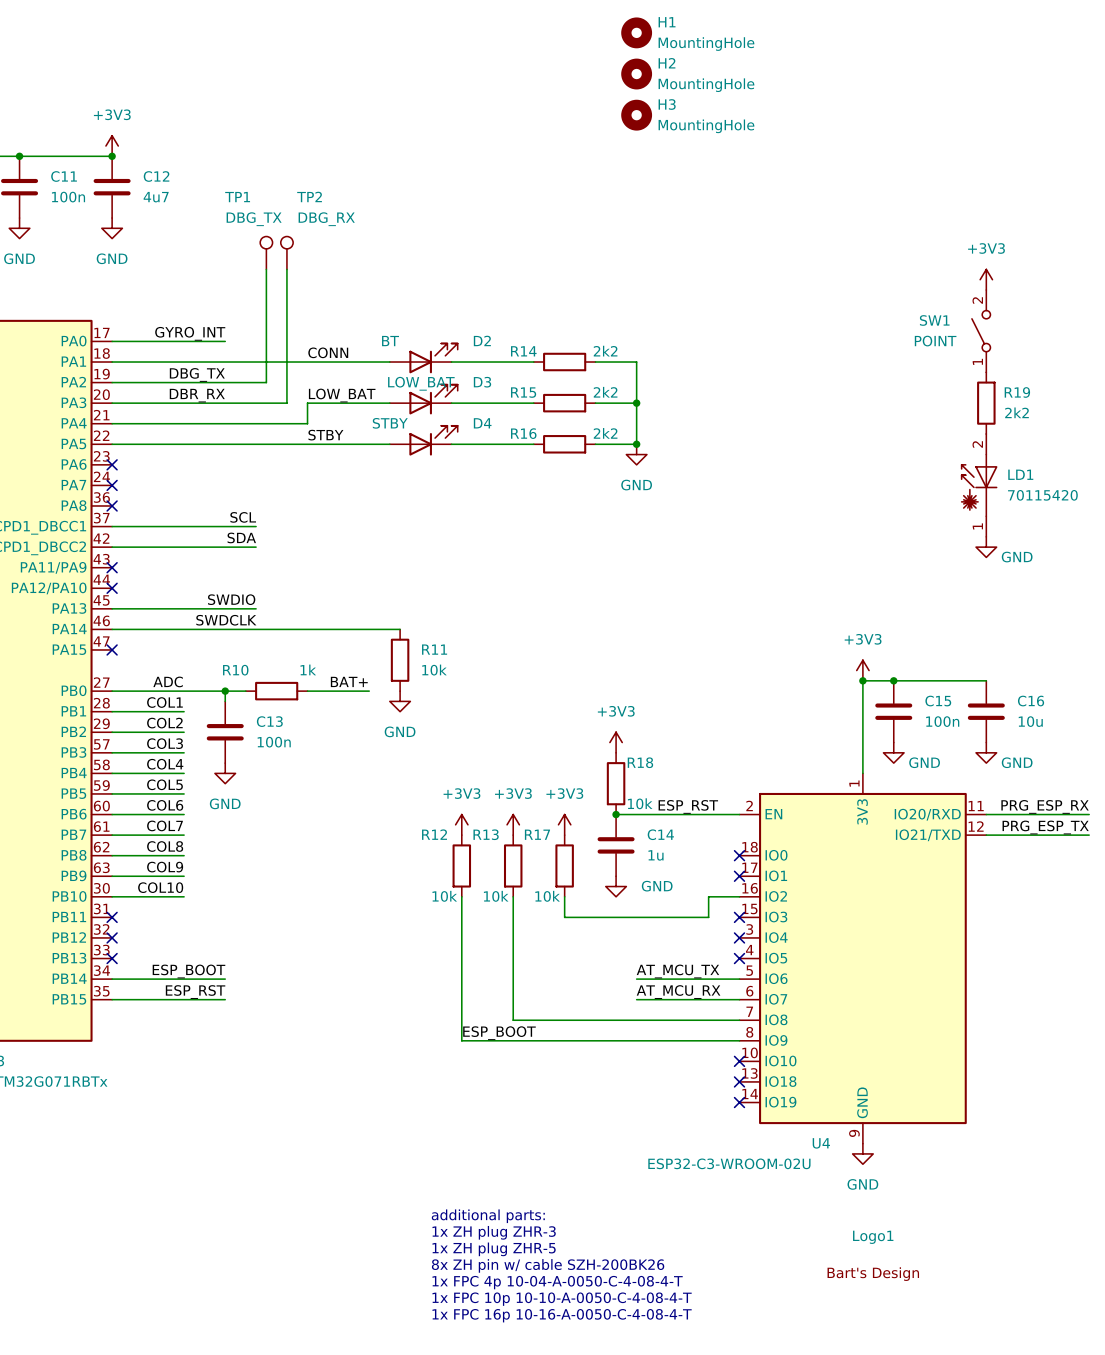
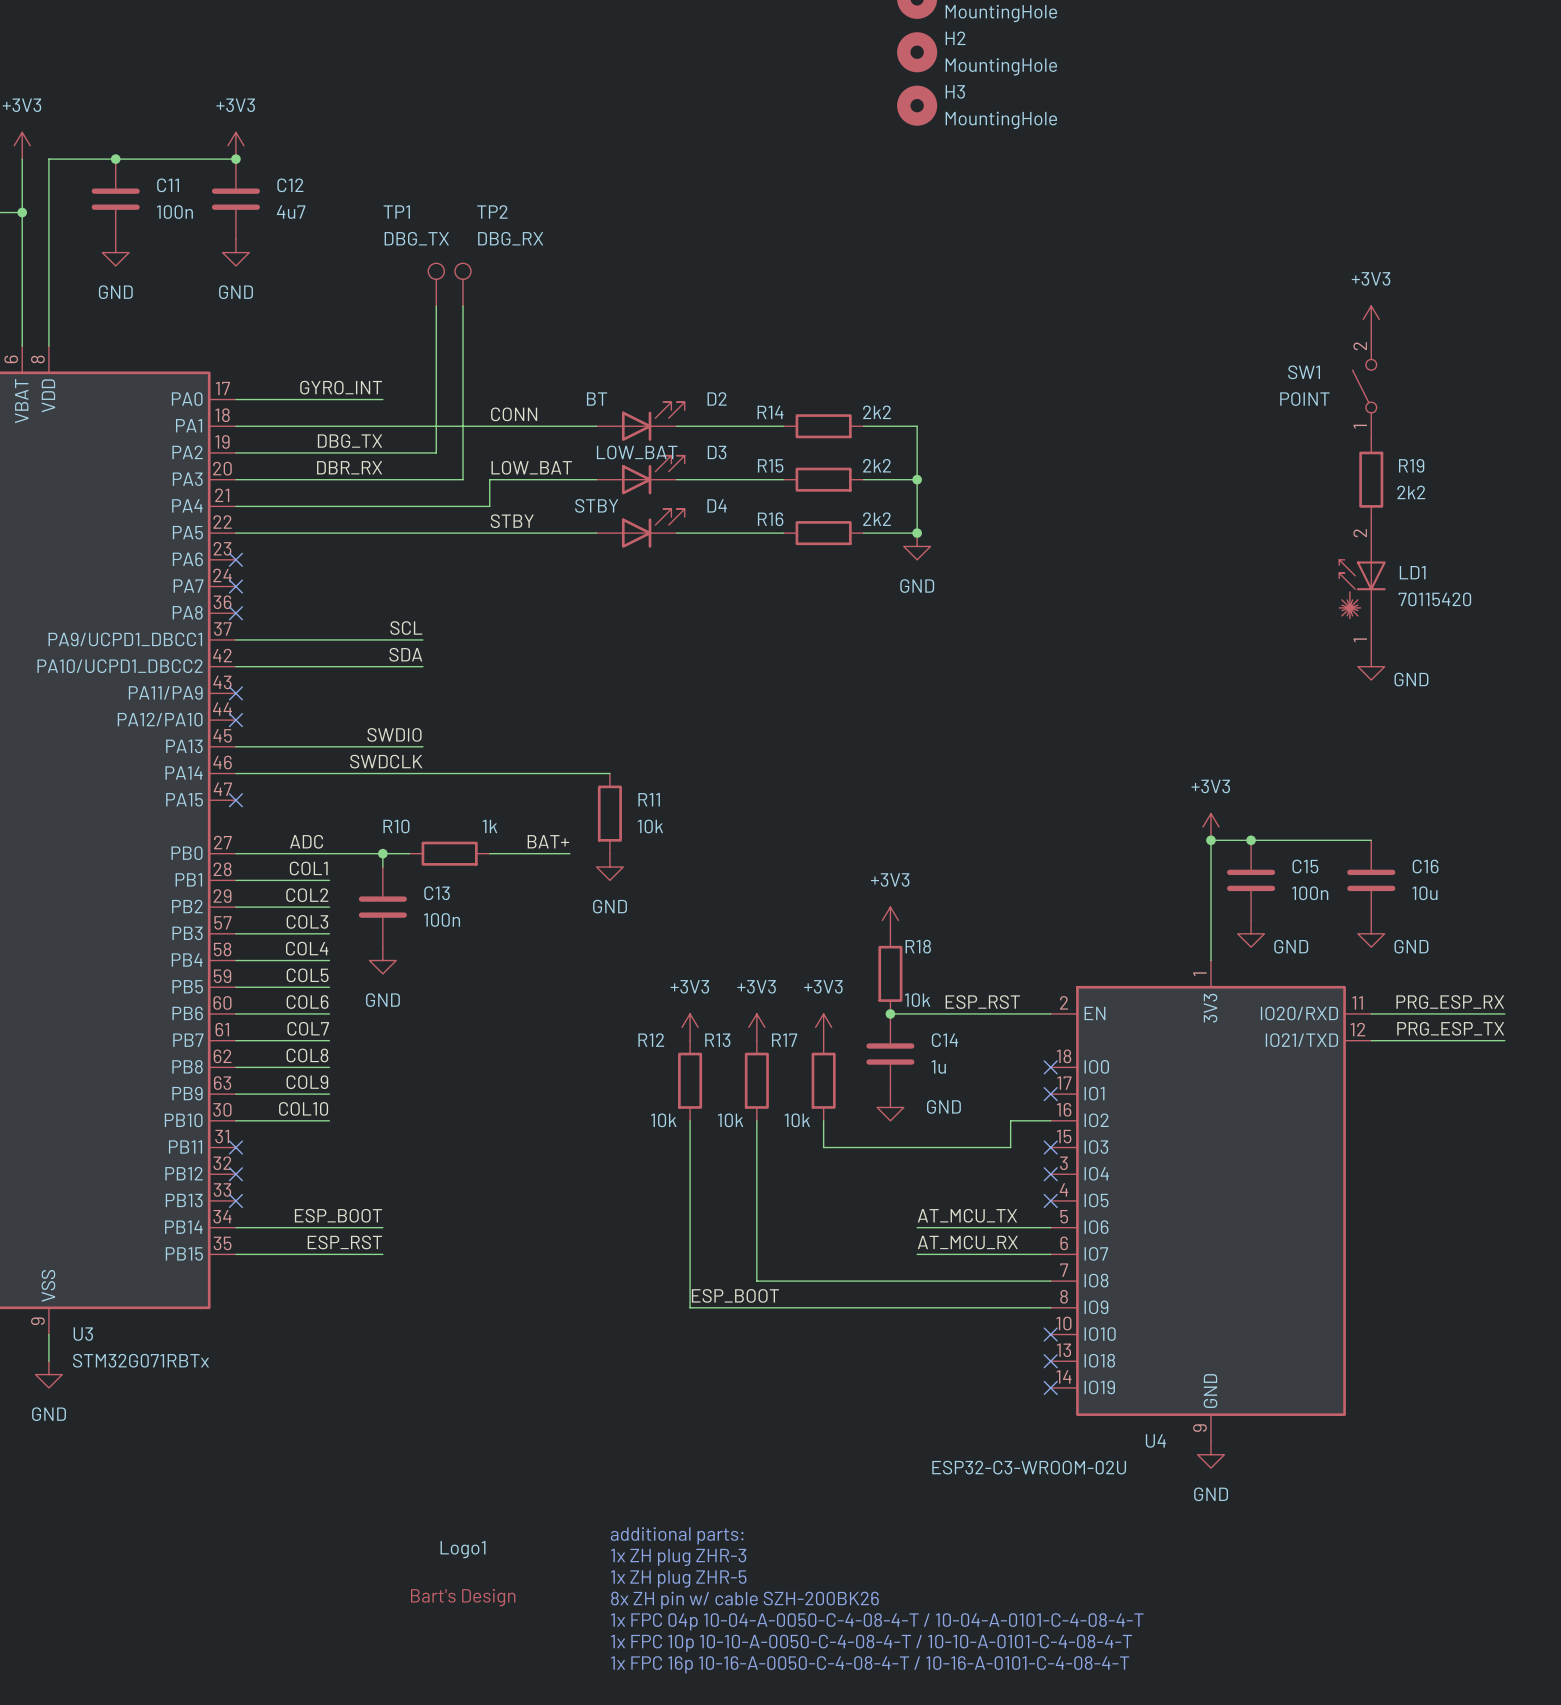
text position: additional parts: (488, 1216) -> additional parts: (677, 1535)
text position: 1x ZH plug ZHR-3 (494, 1232) -> 1x ZH plug ZHR-3 (678, 1557)
text position: 1x ZH plug ZHR-5 (494, 1249) -> 1x ZH plug ZHR-5 (678, 1578)
Logo1 position: (873, 1255) -> (463, 1573)
text position: 8x ZH pin w/ cable SZH-200BK26 (548, 1265) -> 8x ZH pin w/ cable SZH-200BK26 (744, 1600)
text: 1x FPC 4p 10-04-A-0050-C-4-08-4-T (557, 1282) -> none
text: none -> 1x FPC 04p 10-04-A-0050-C-4-08-4-T / 10-04-A-0101-C-4-08-4-T (877, 1621)
text: 1x FPC 10p 10-10-A-0050-C-4-08-4-T (562, 1299) -> none
text: none -> 1x FPC 10p 10-10-A-0050-C-4-08-4-T / 10-10-A-0101-C-4-08-4-T (871, 1643)
text: 1x FPC 16p 10-16-A-0050-C-4-08-4-T (562, 1315) -> none
text: none -> 1x FPC 16p 10-16-A-0050-C-4-08-4-T / 10-16-A-0101-C-4-08-4-T (870, 1664)

